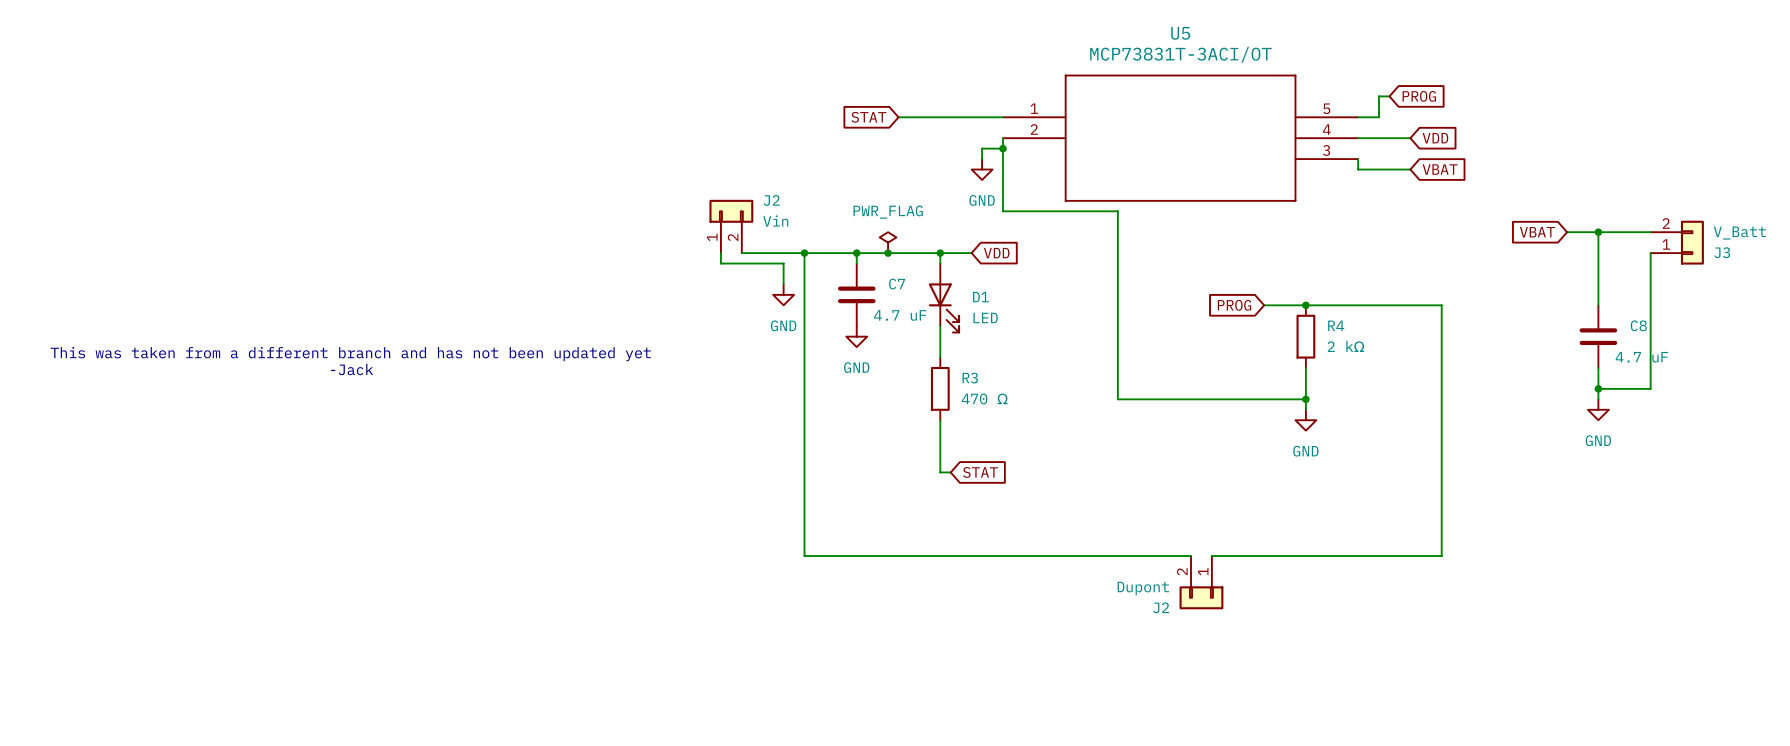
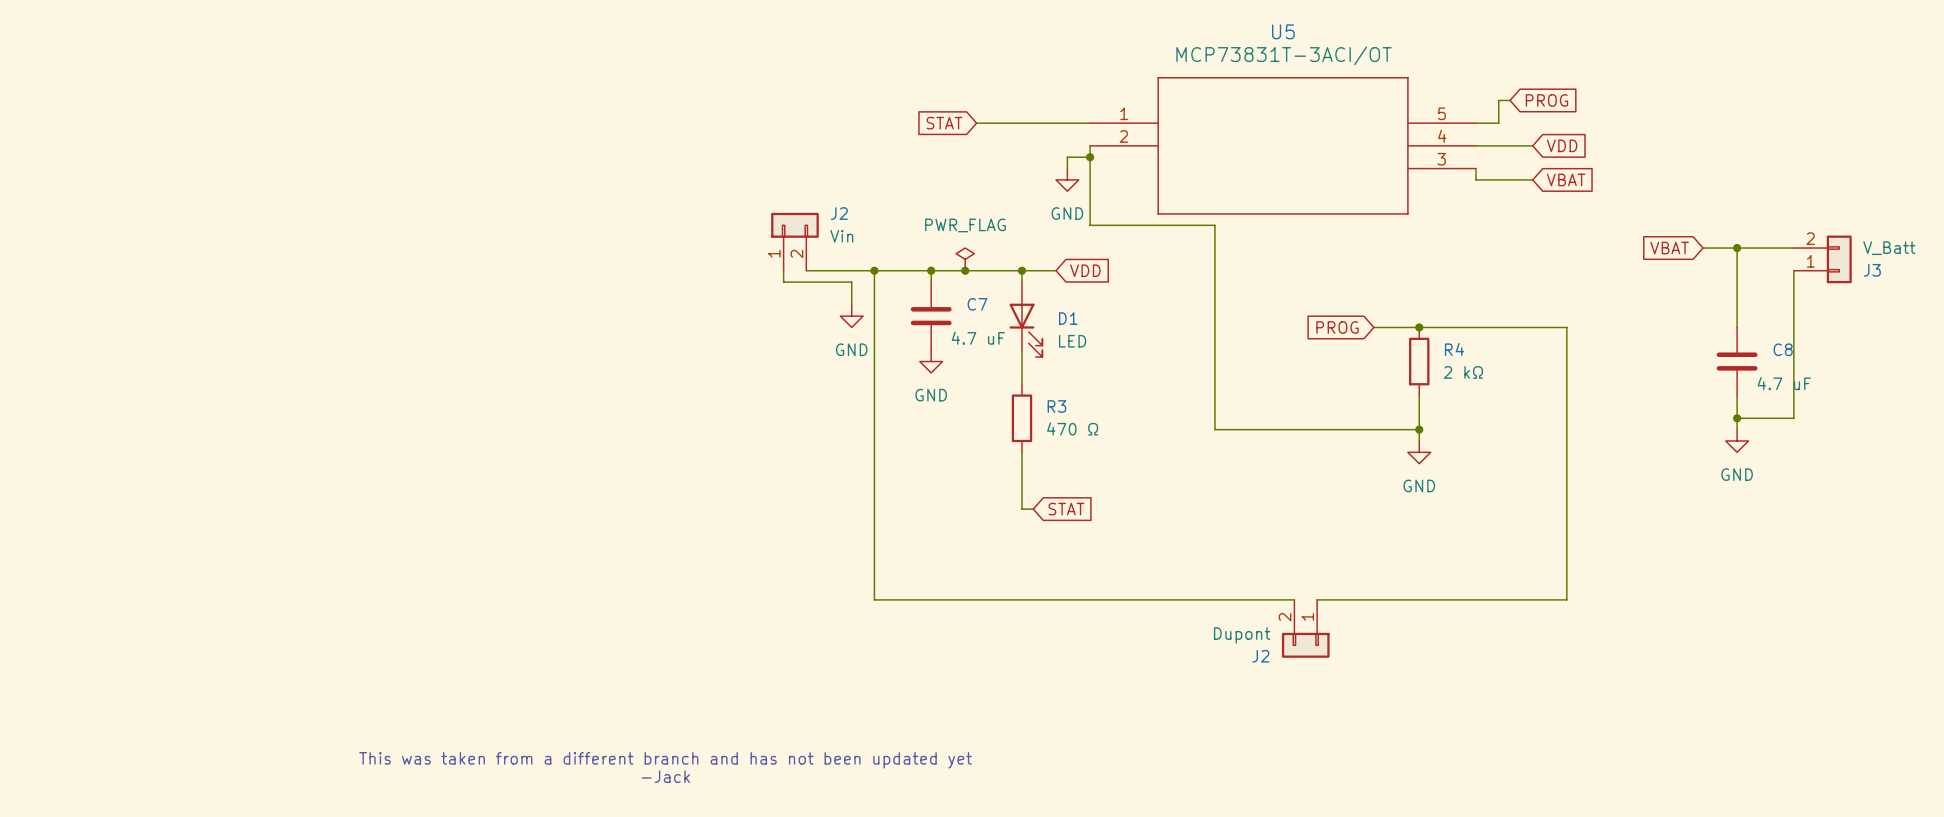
text: This was taken from a different branch and has not been updated yet (350, 354) -> none
text: -Jack (352, 369) -> none
text: none -> This was taken from a different branch and has not been updated yet (665, 760)
text: none -> -Jack (665, 776)

